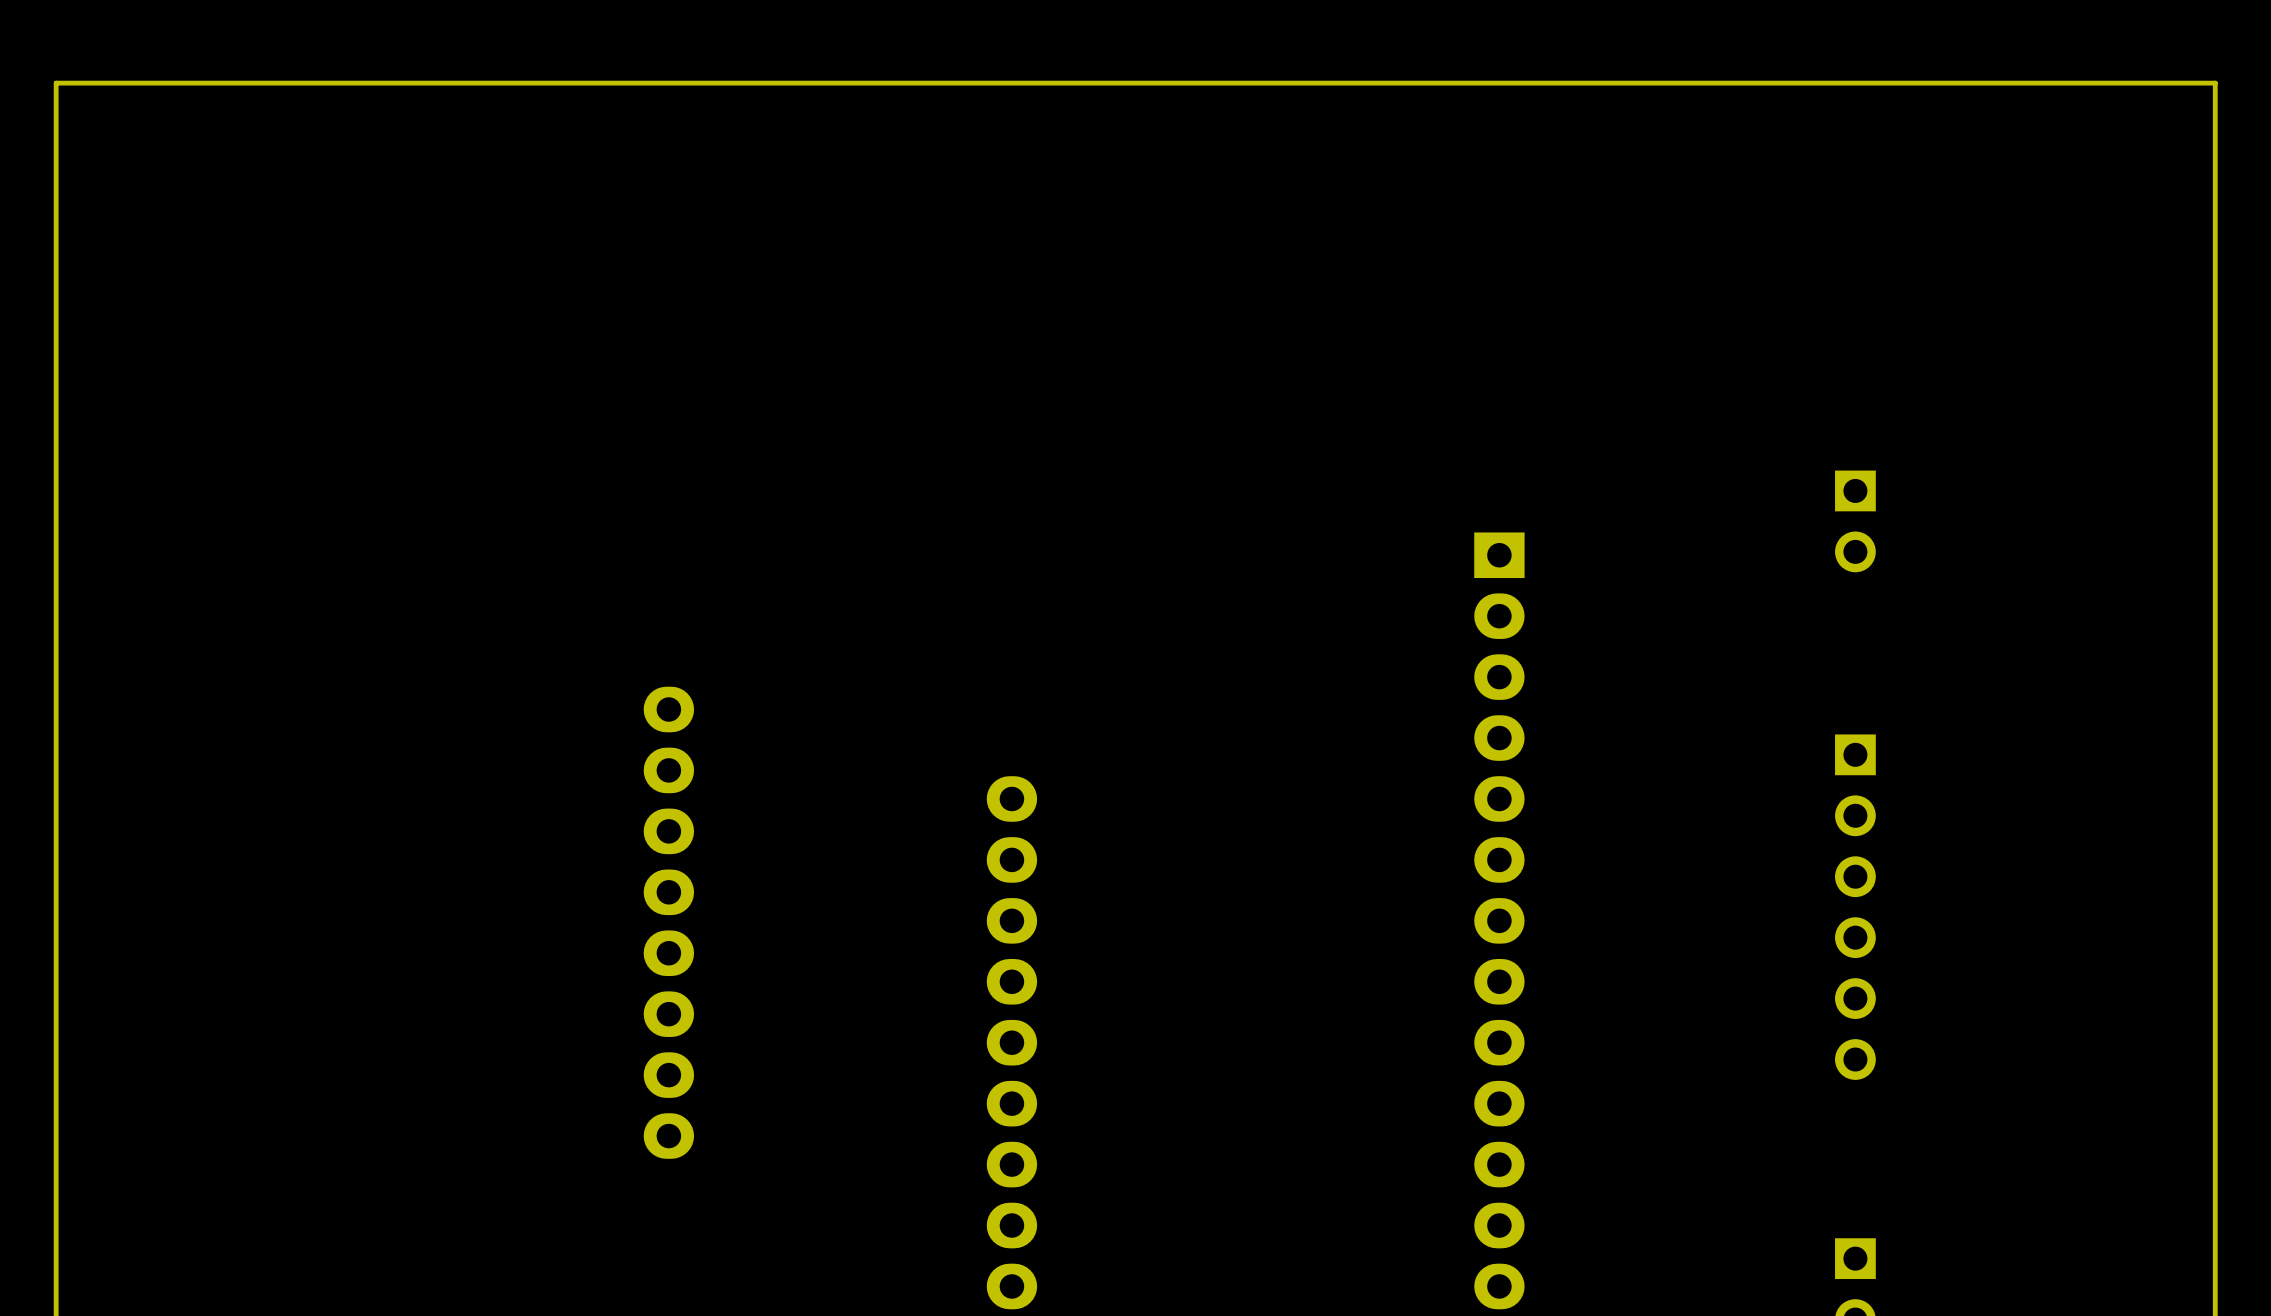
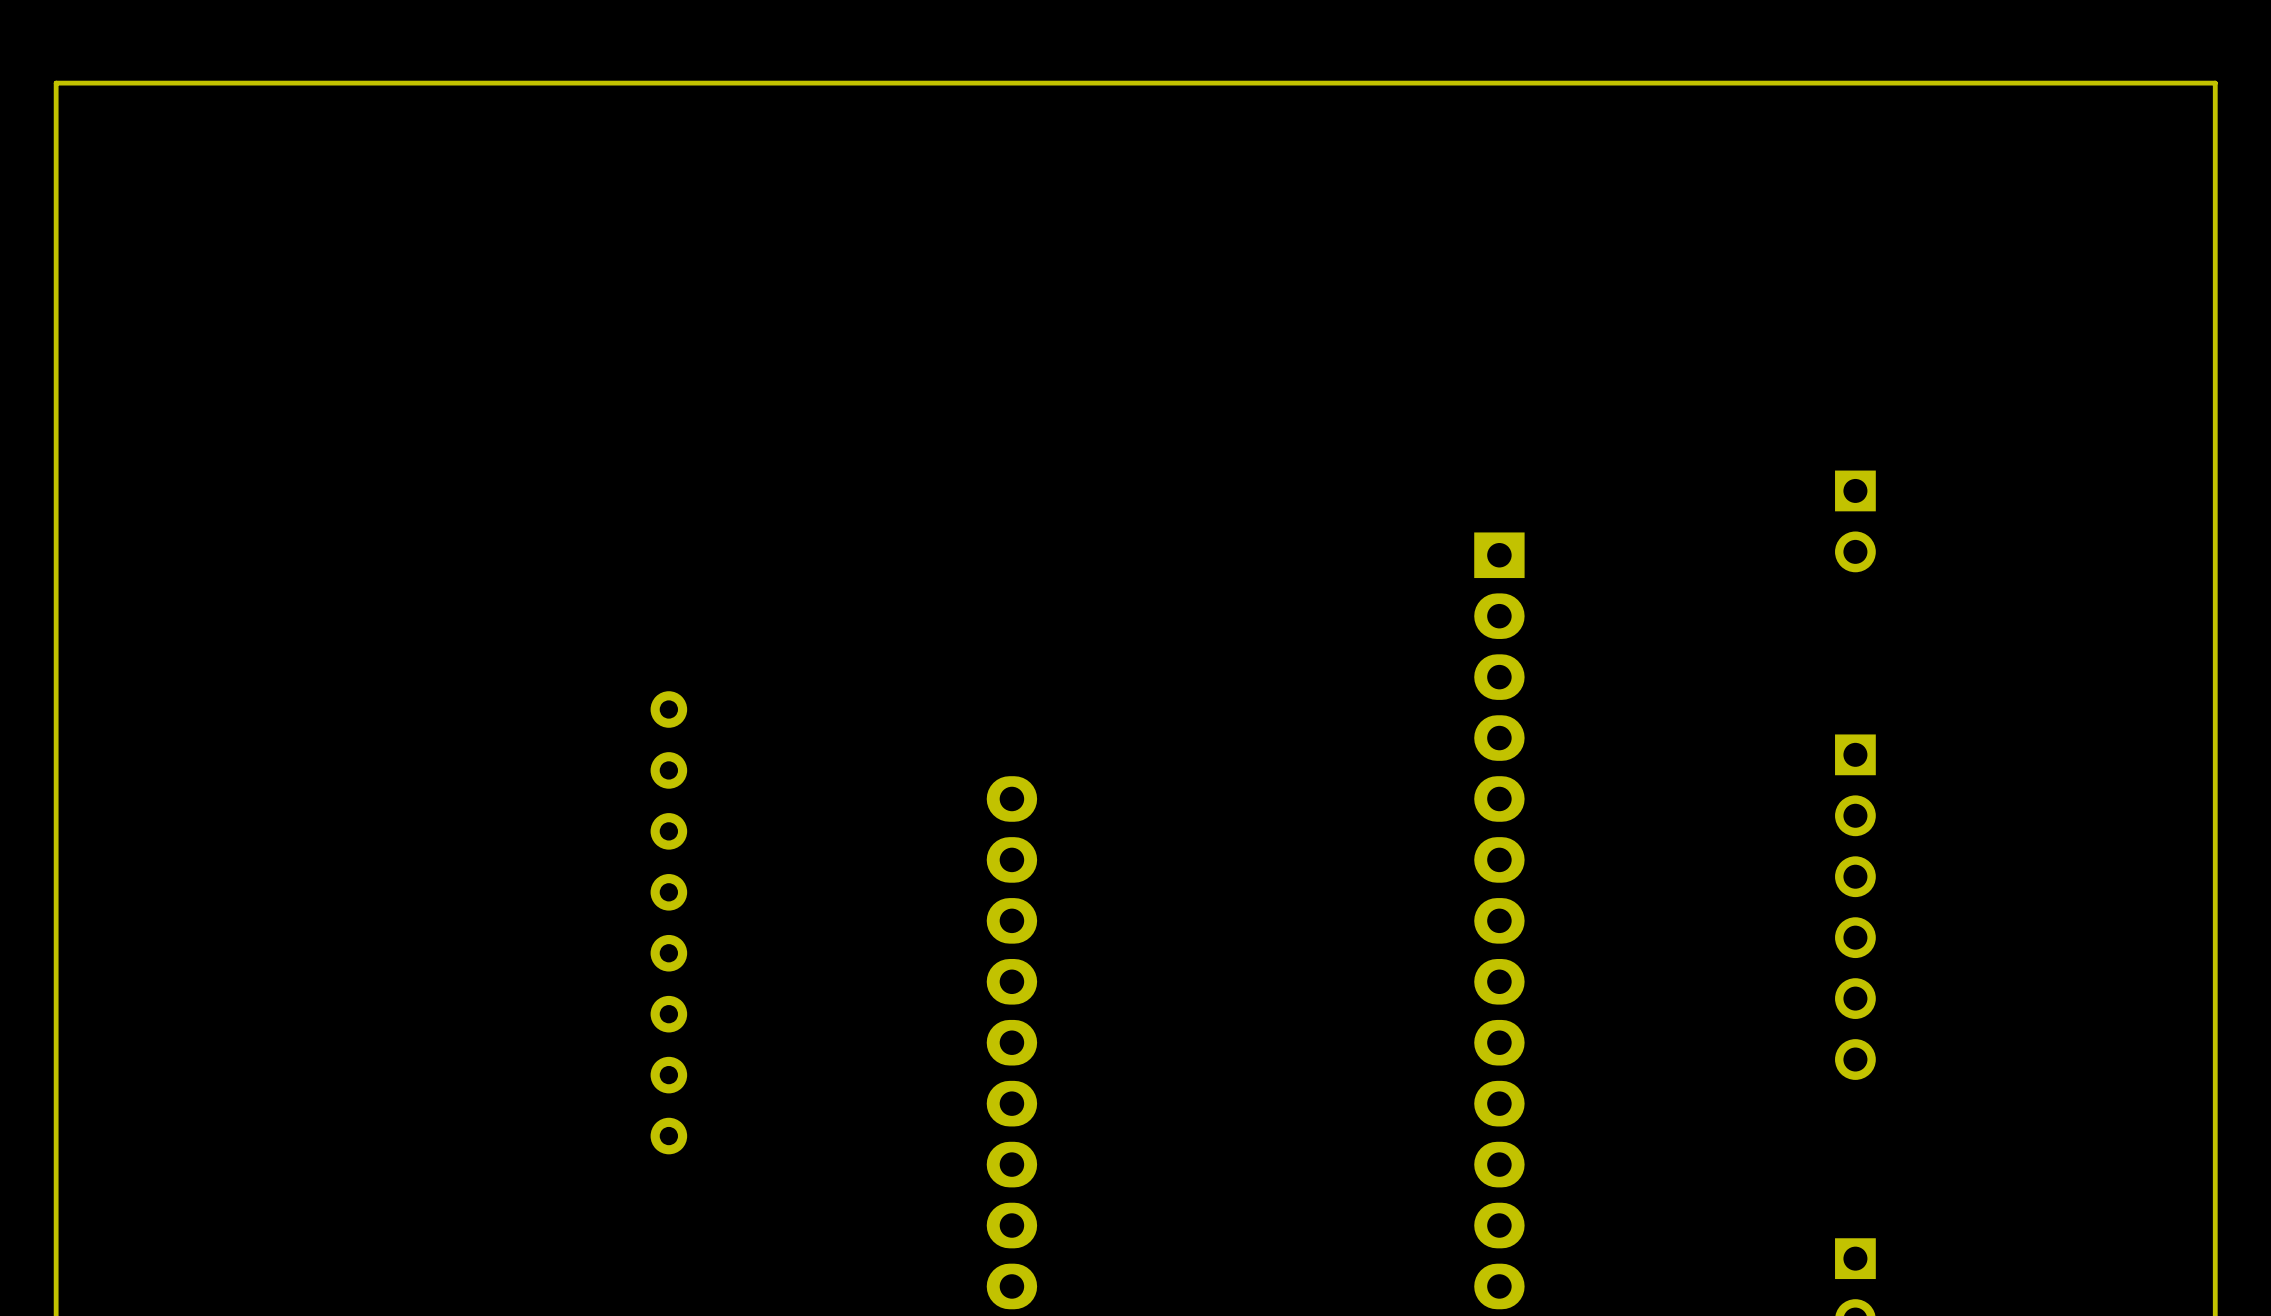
part footprint: [643, 686, 695, 1159] -> [650, 691, 688, 1155]

